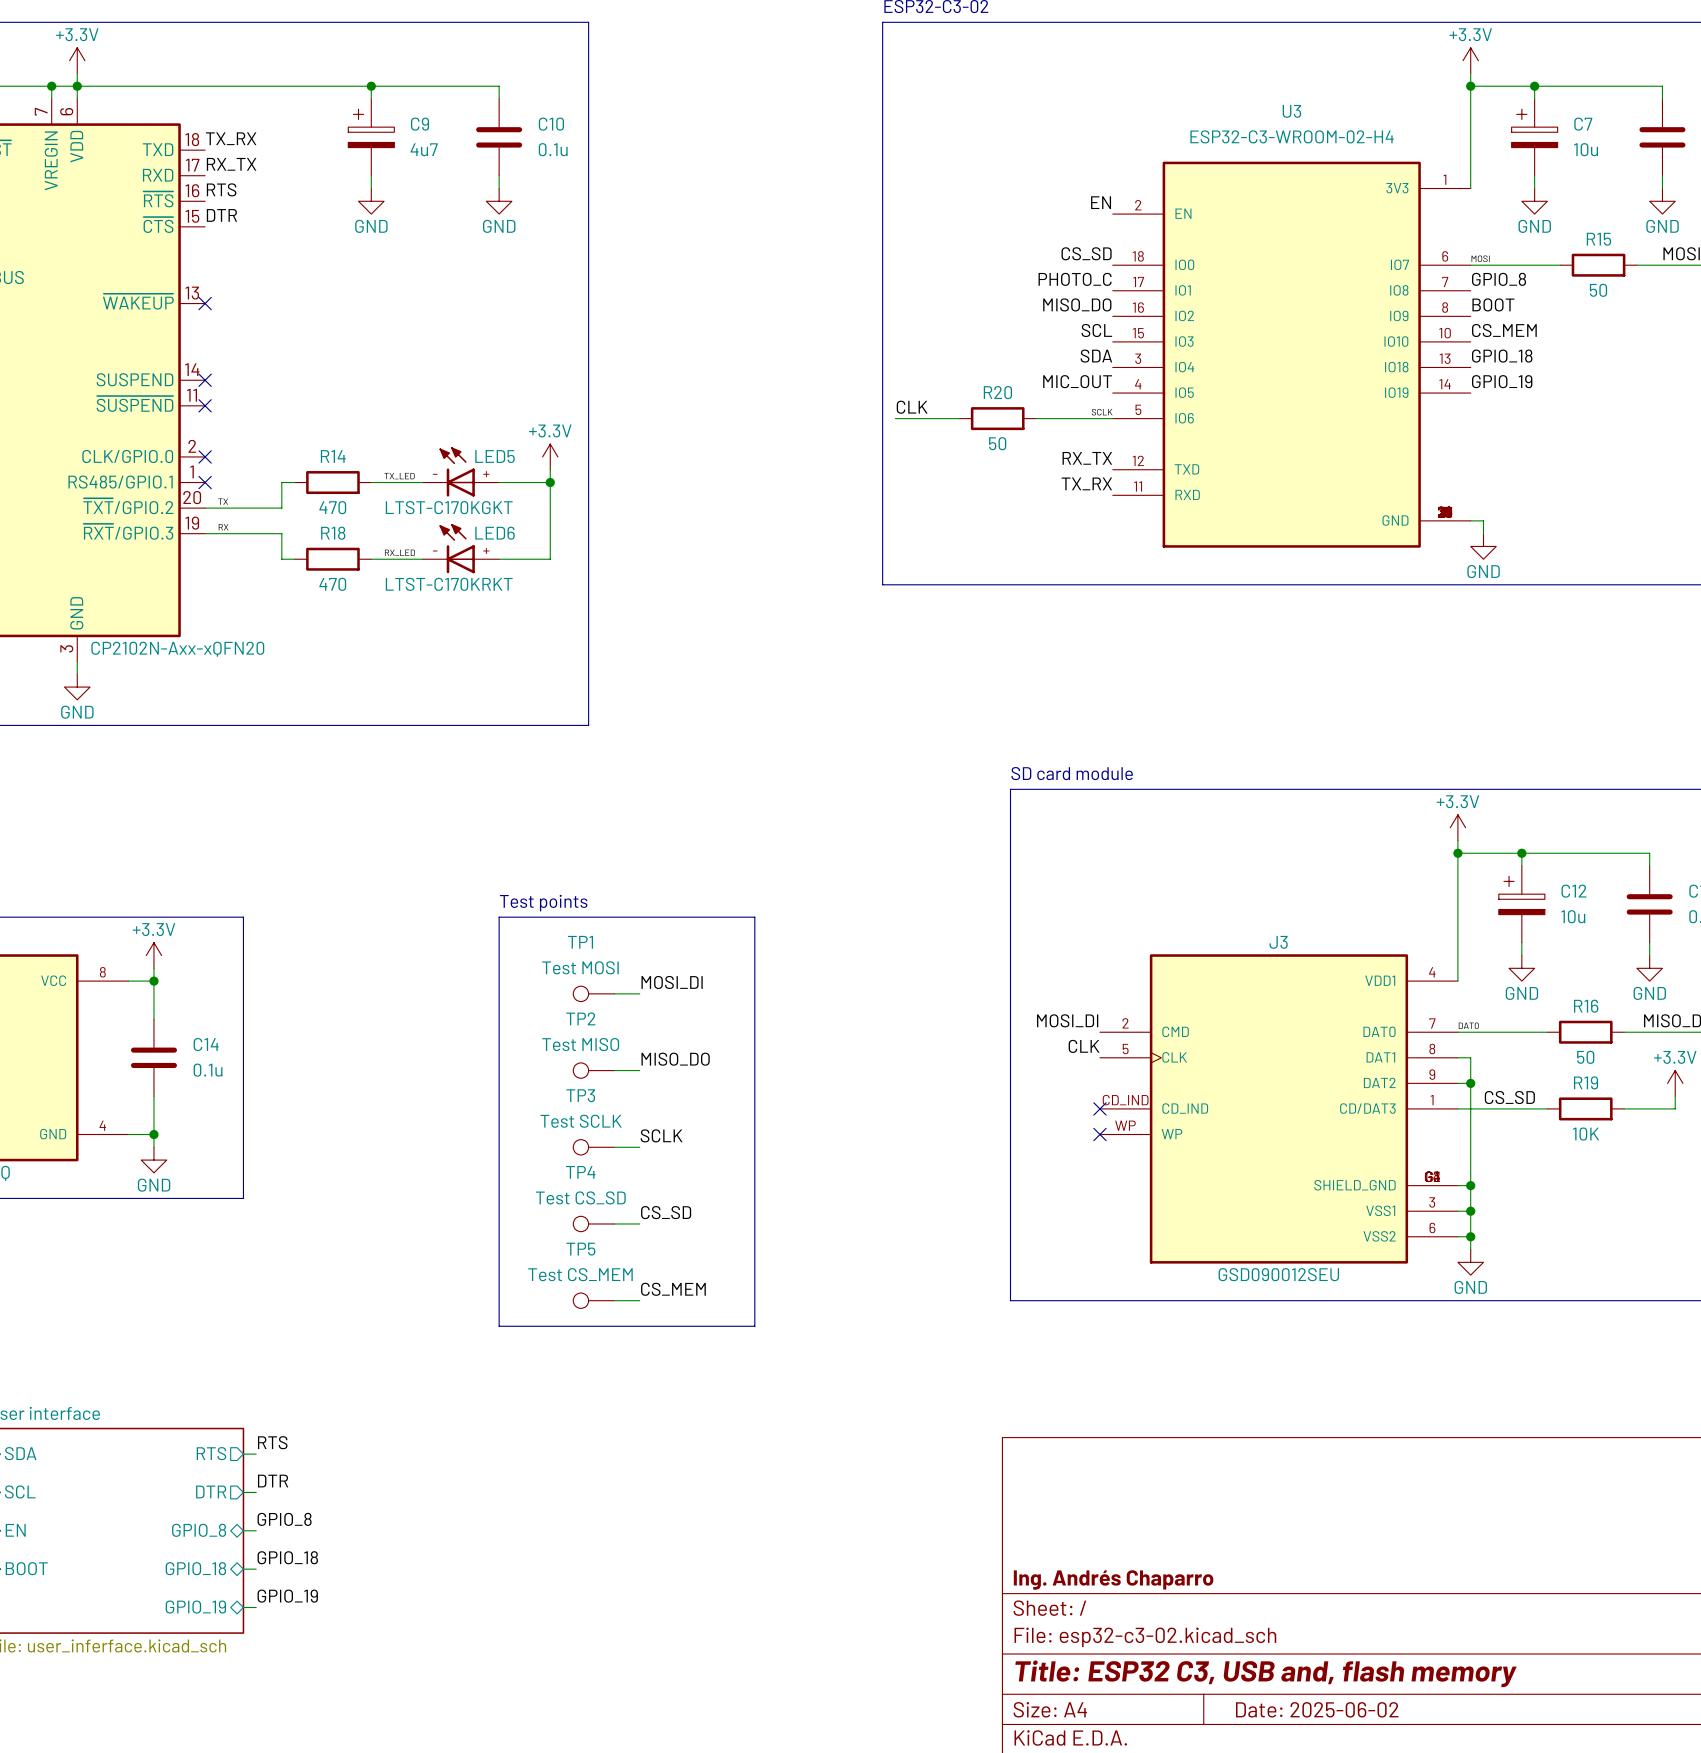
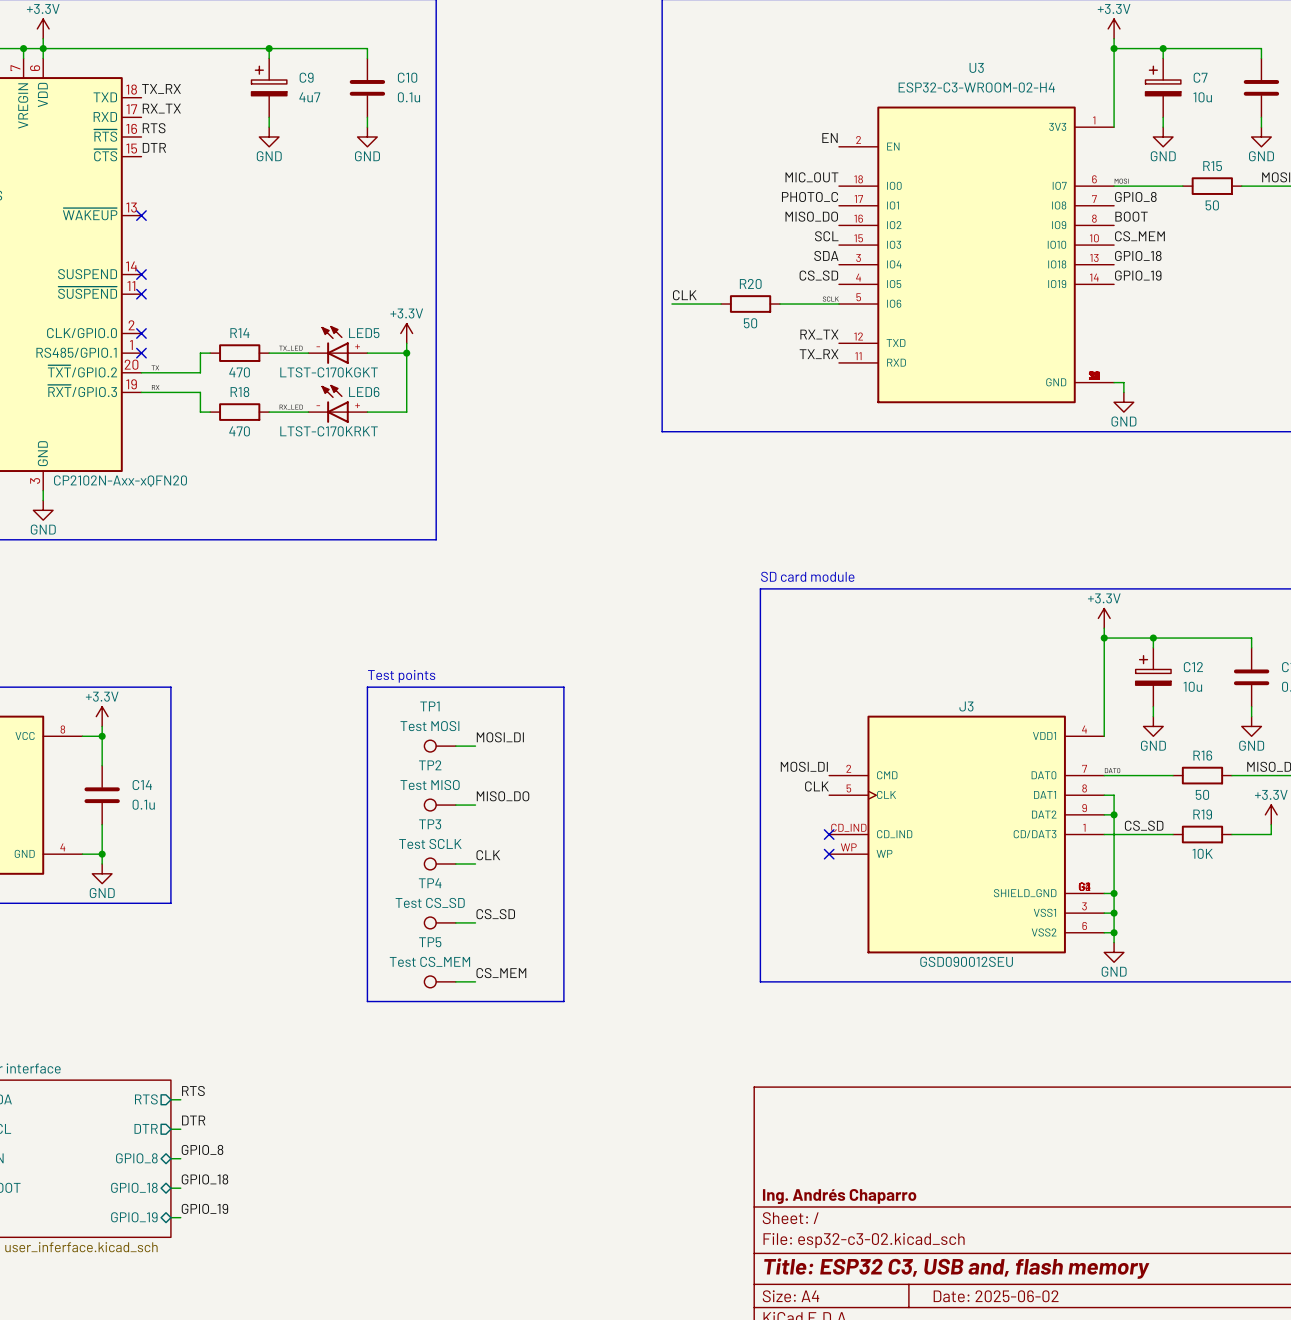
label: CS_SD (1086, 253) -> MIC_OUT (811, 177)
label: MIC_OUT (1077, 381) -> CS_SD (818, 275)
label: SCLK (661, 1135) -> CLK (488, 855)

